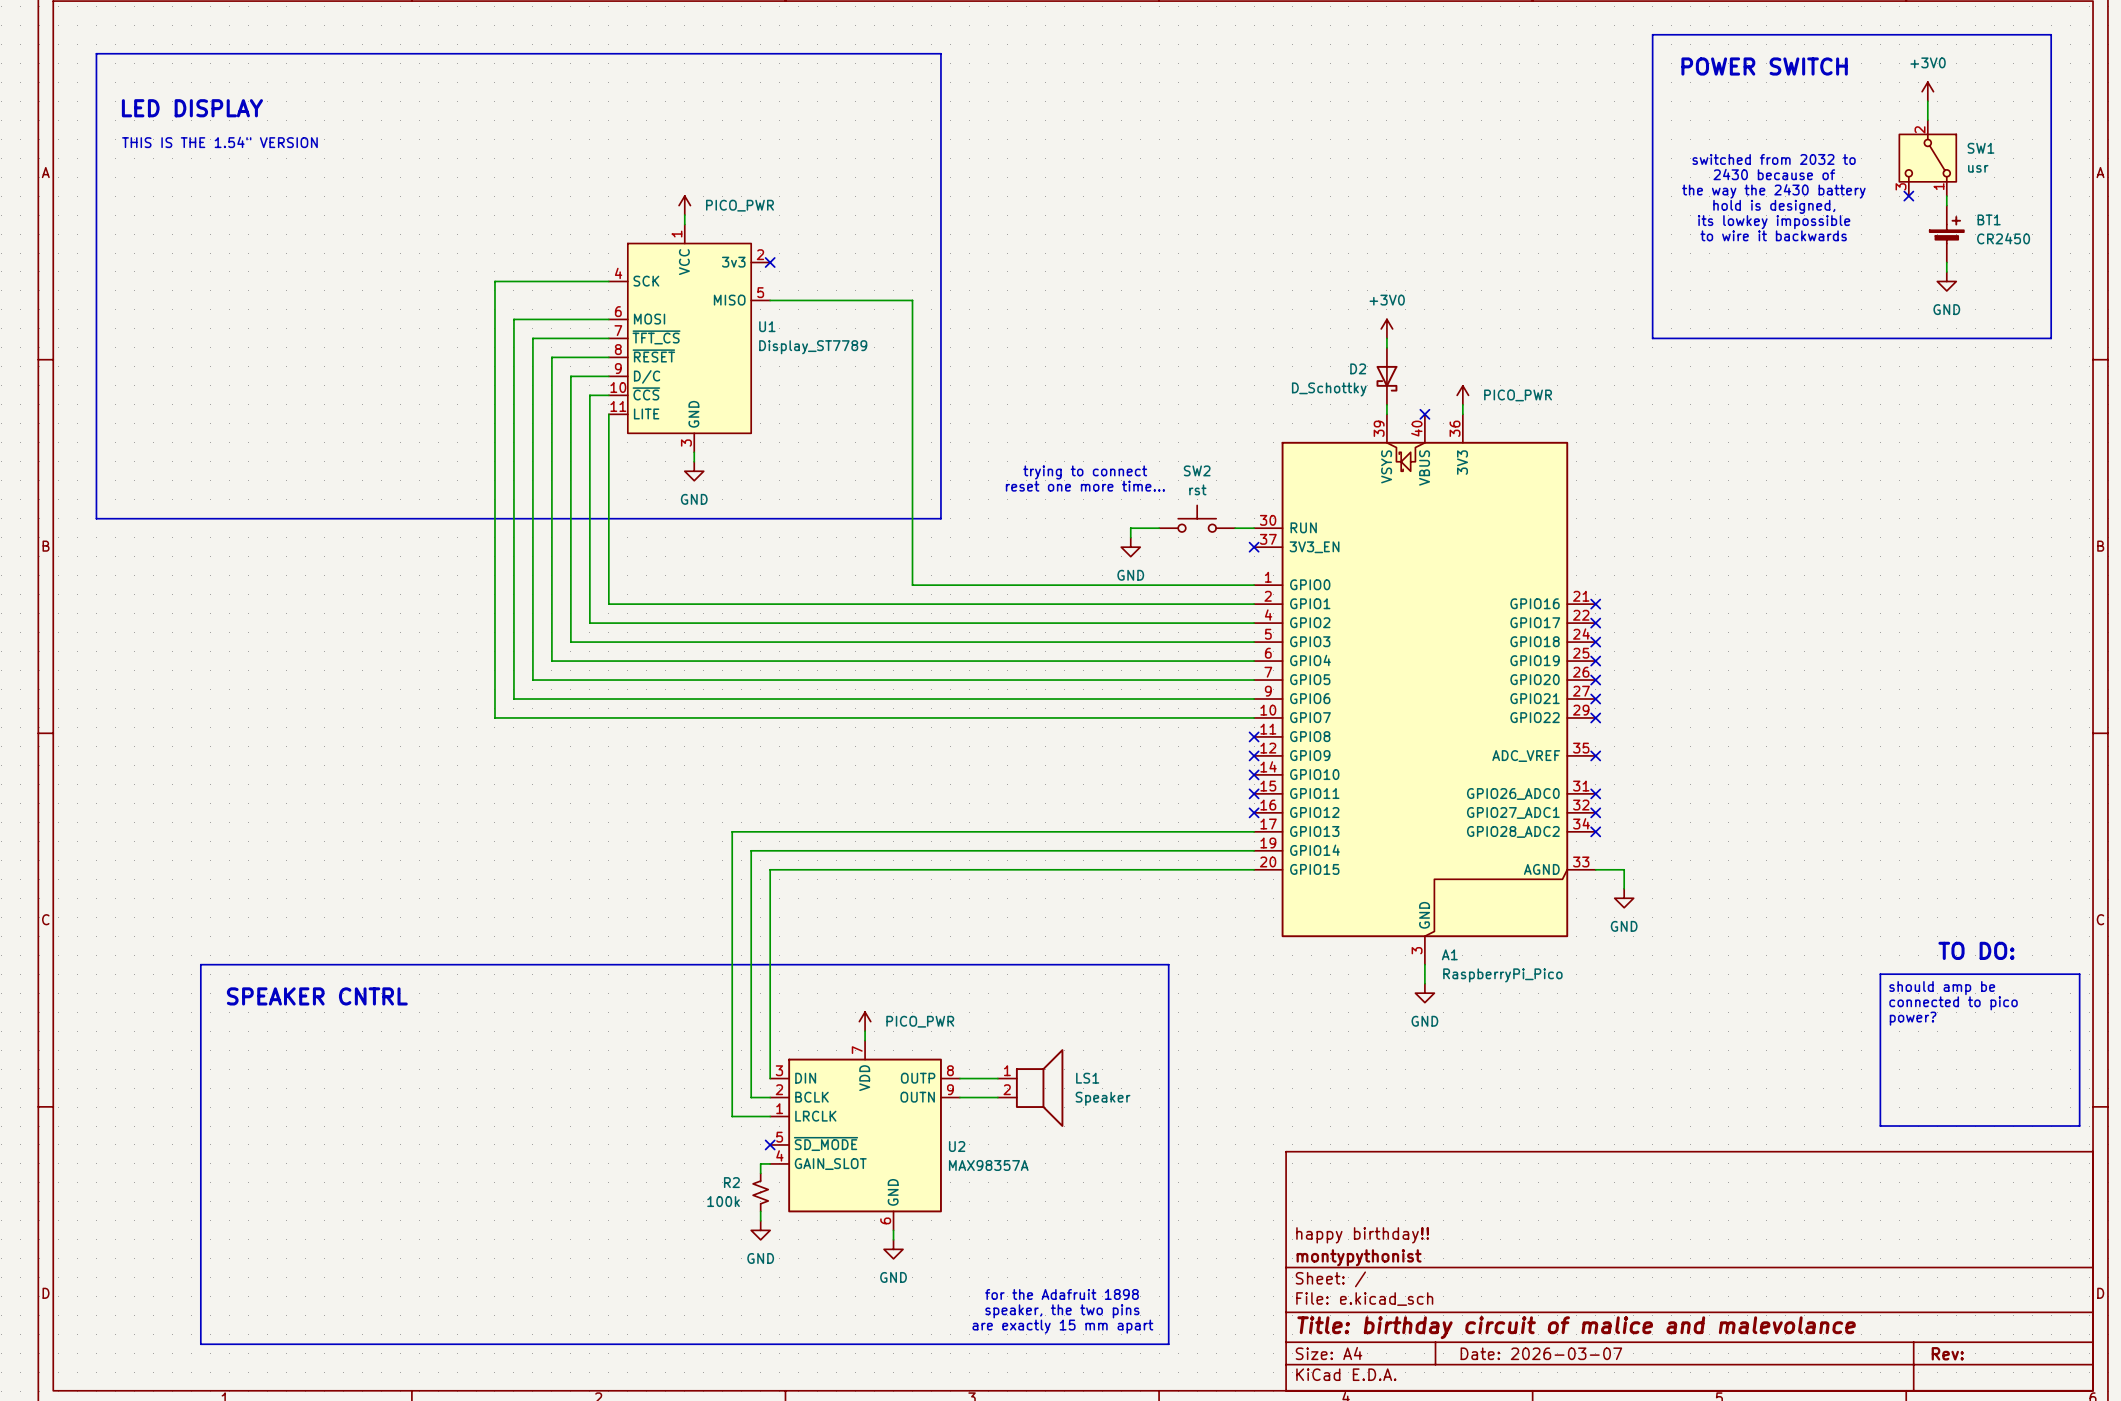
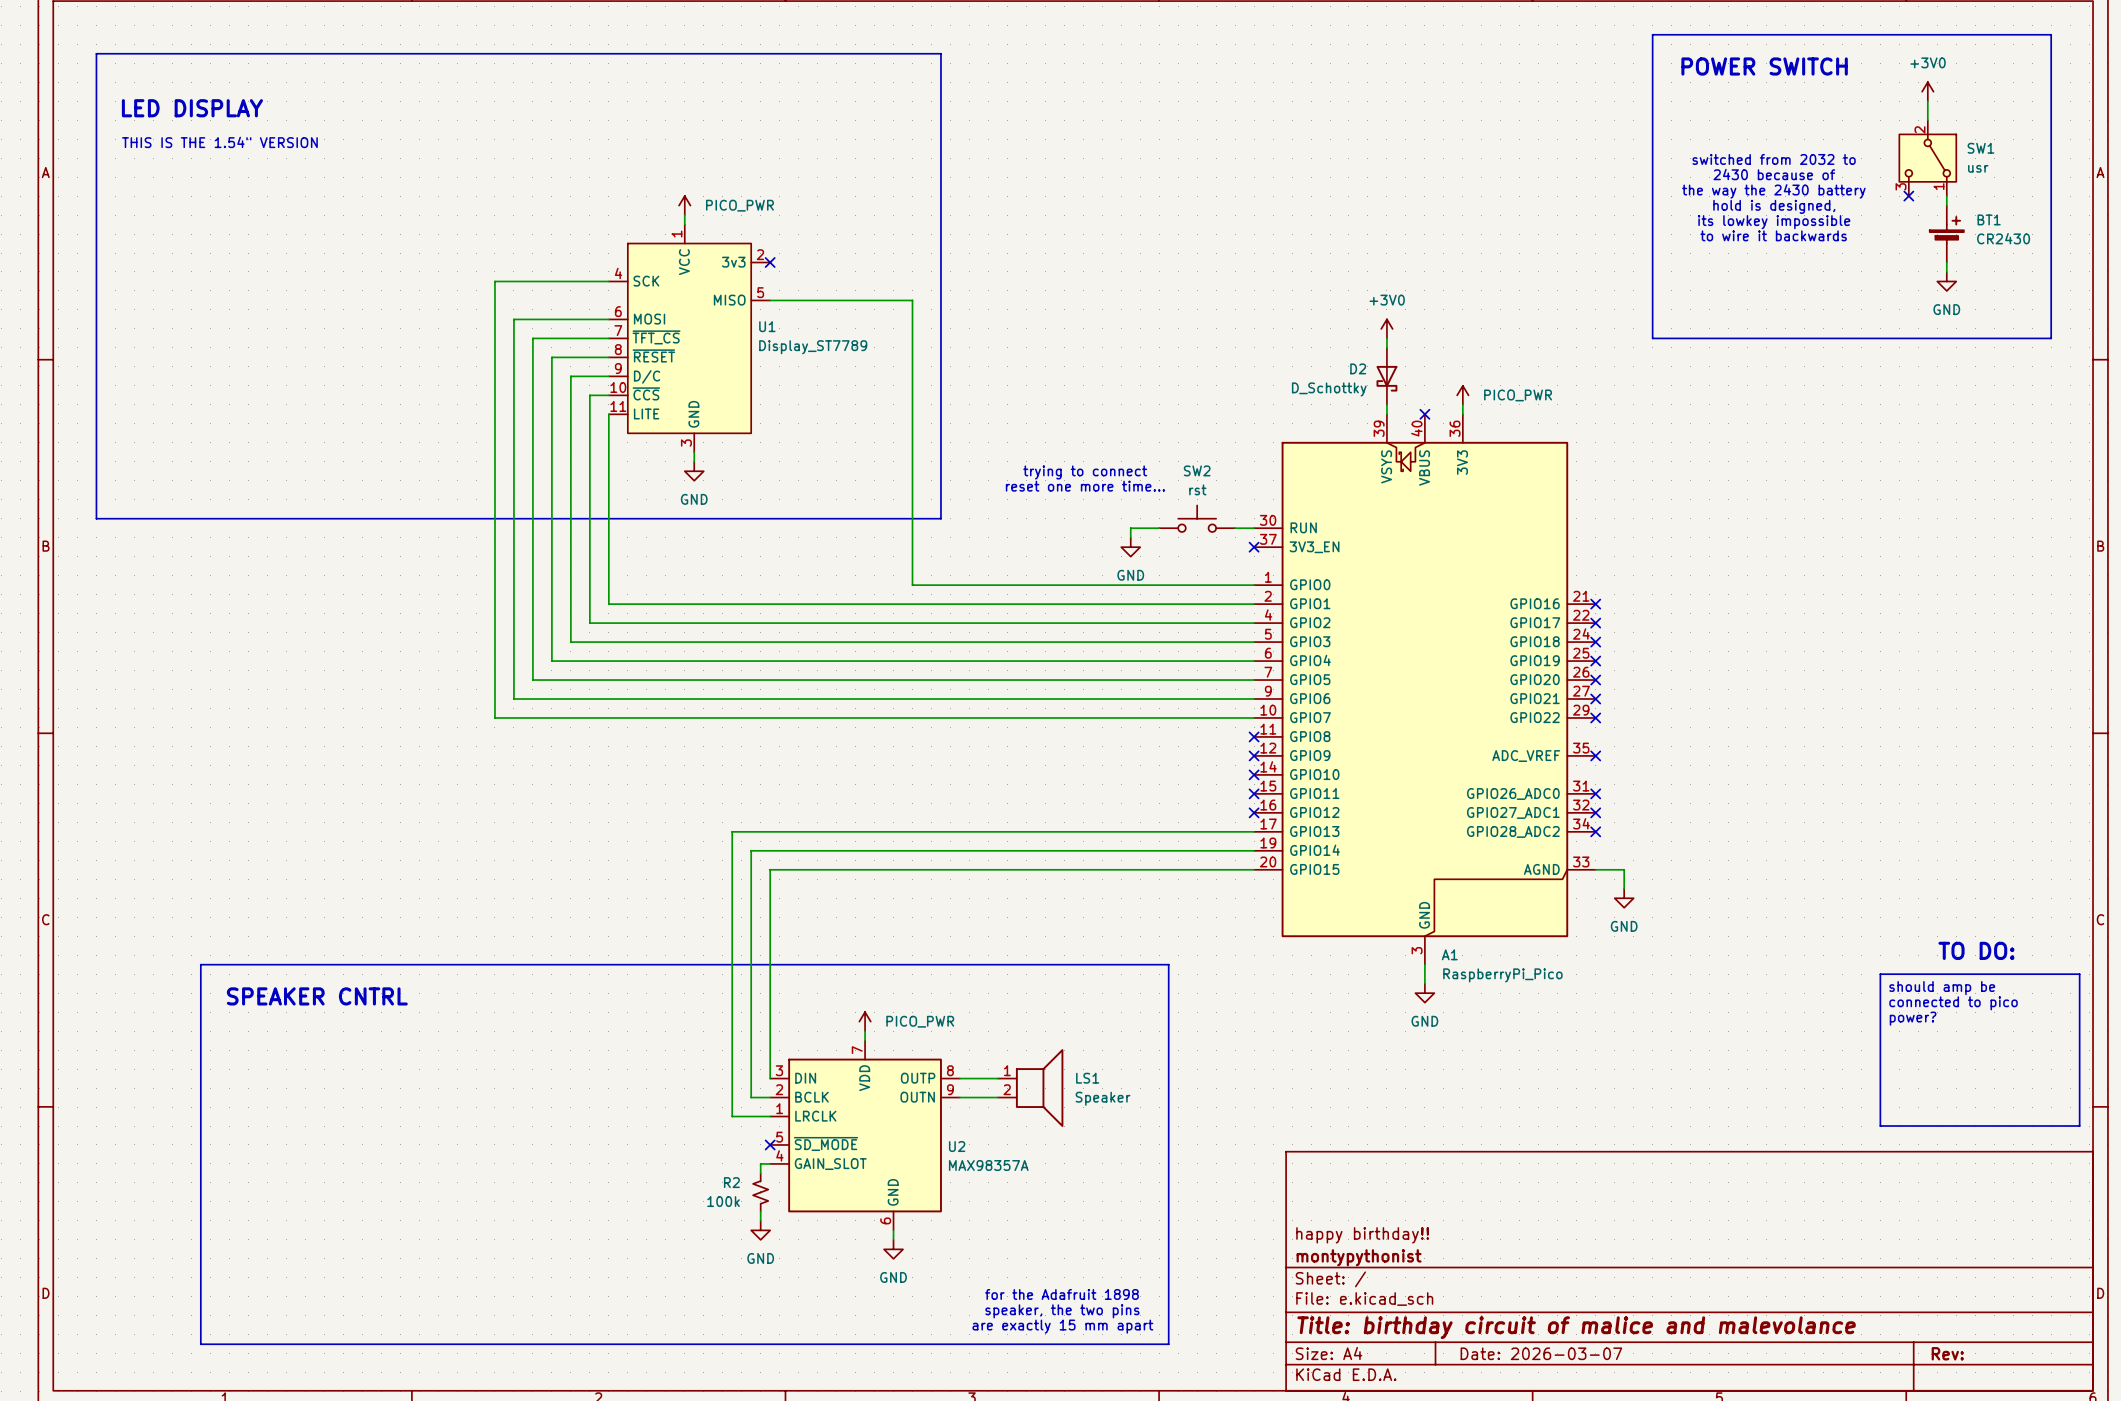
BT1 value: CR2450 (2003, 238) -> CR2430 (2003, 238)

